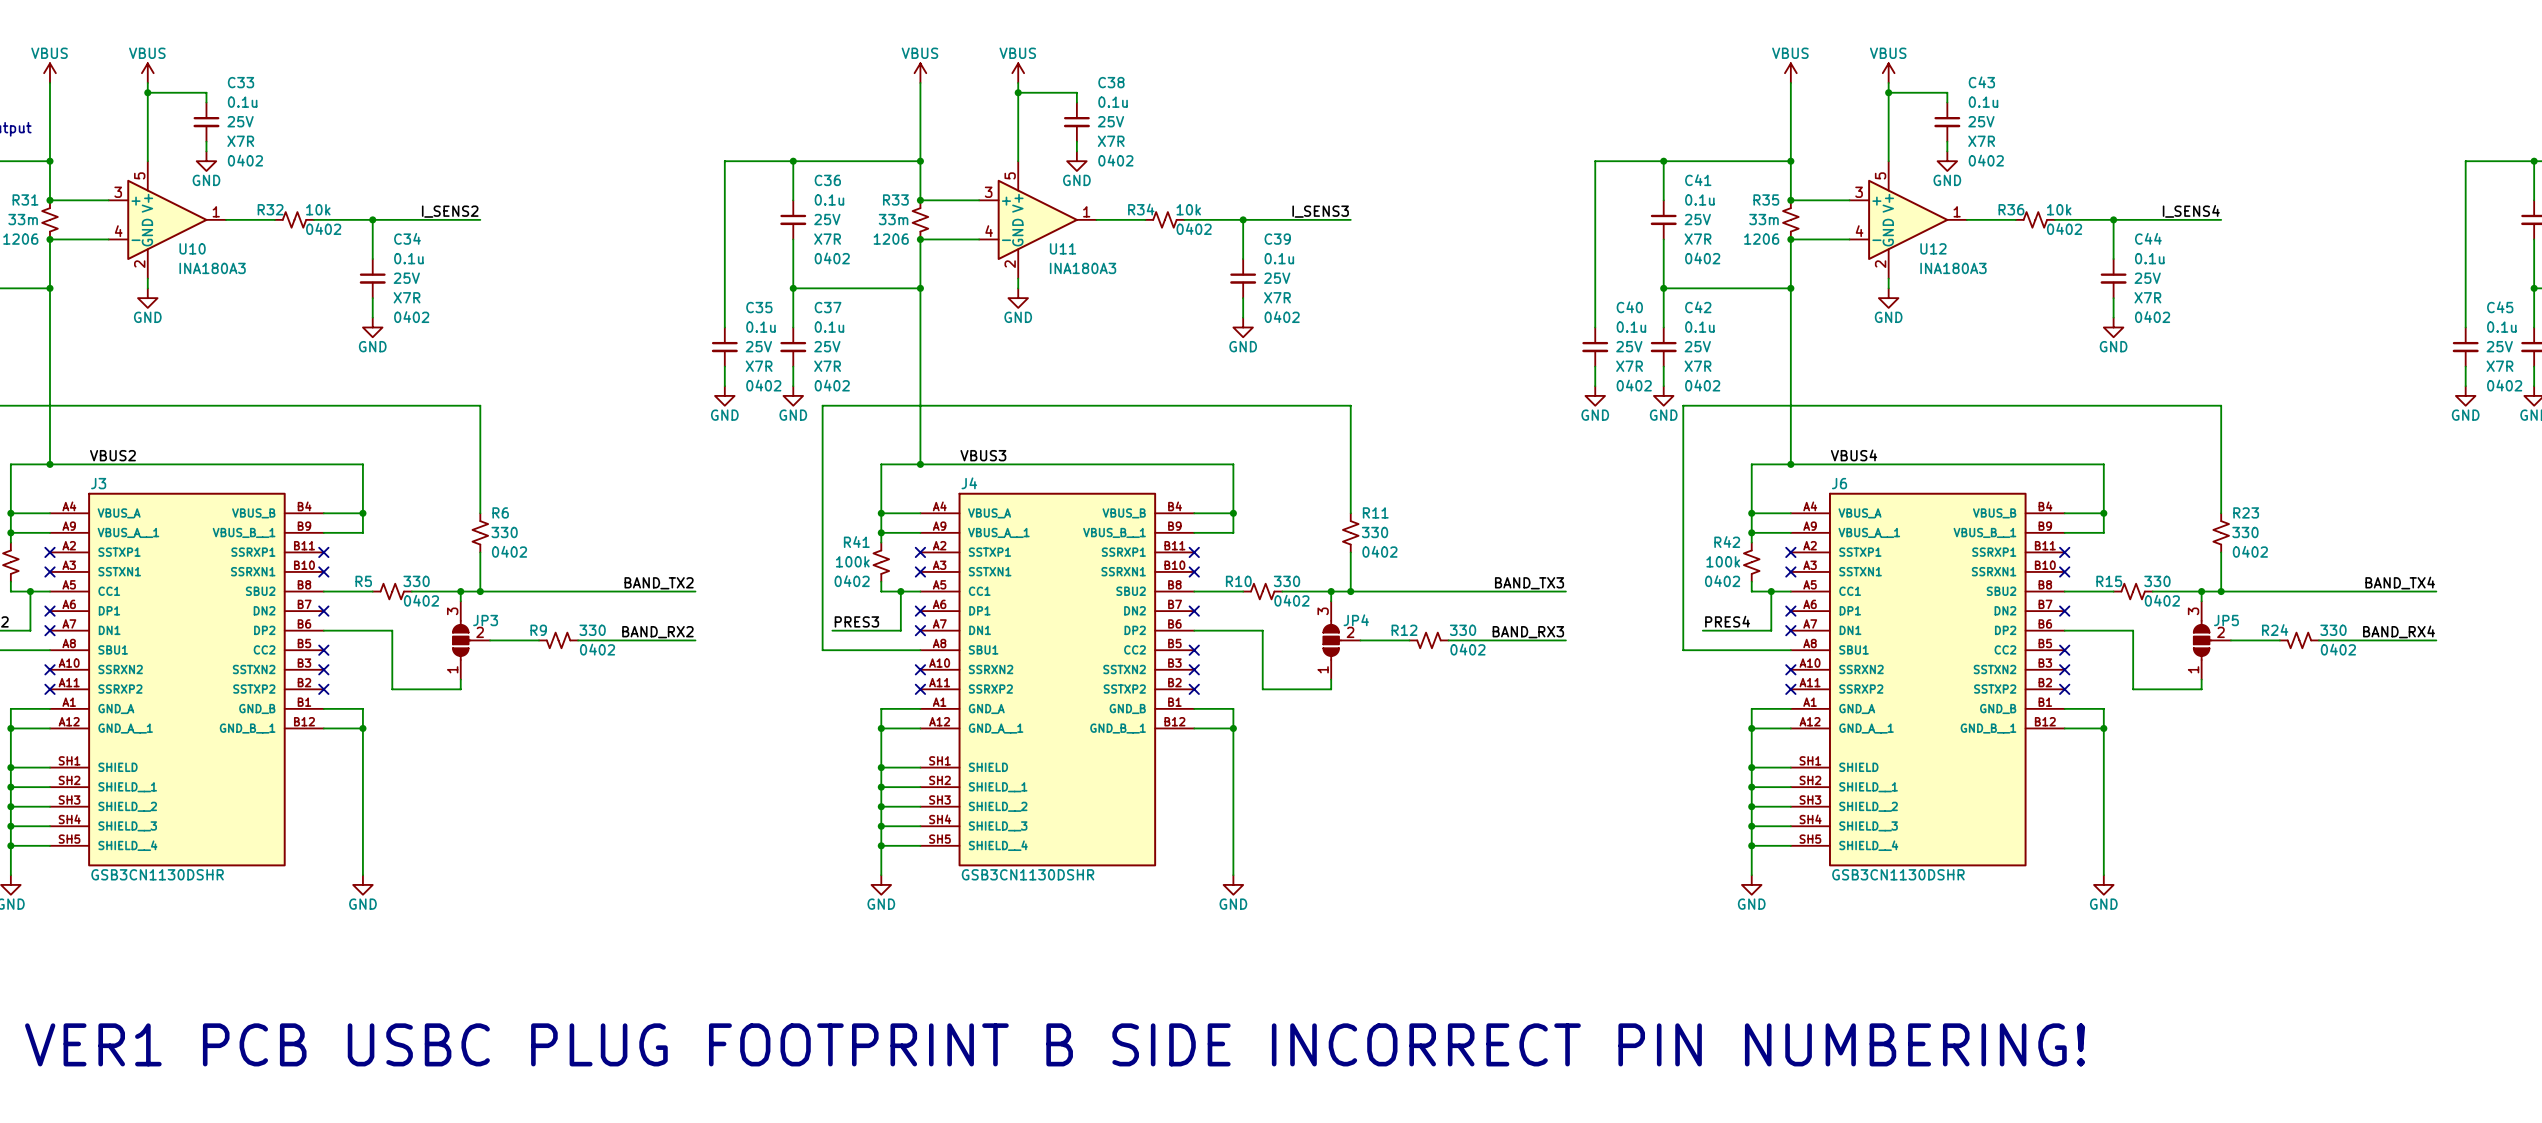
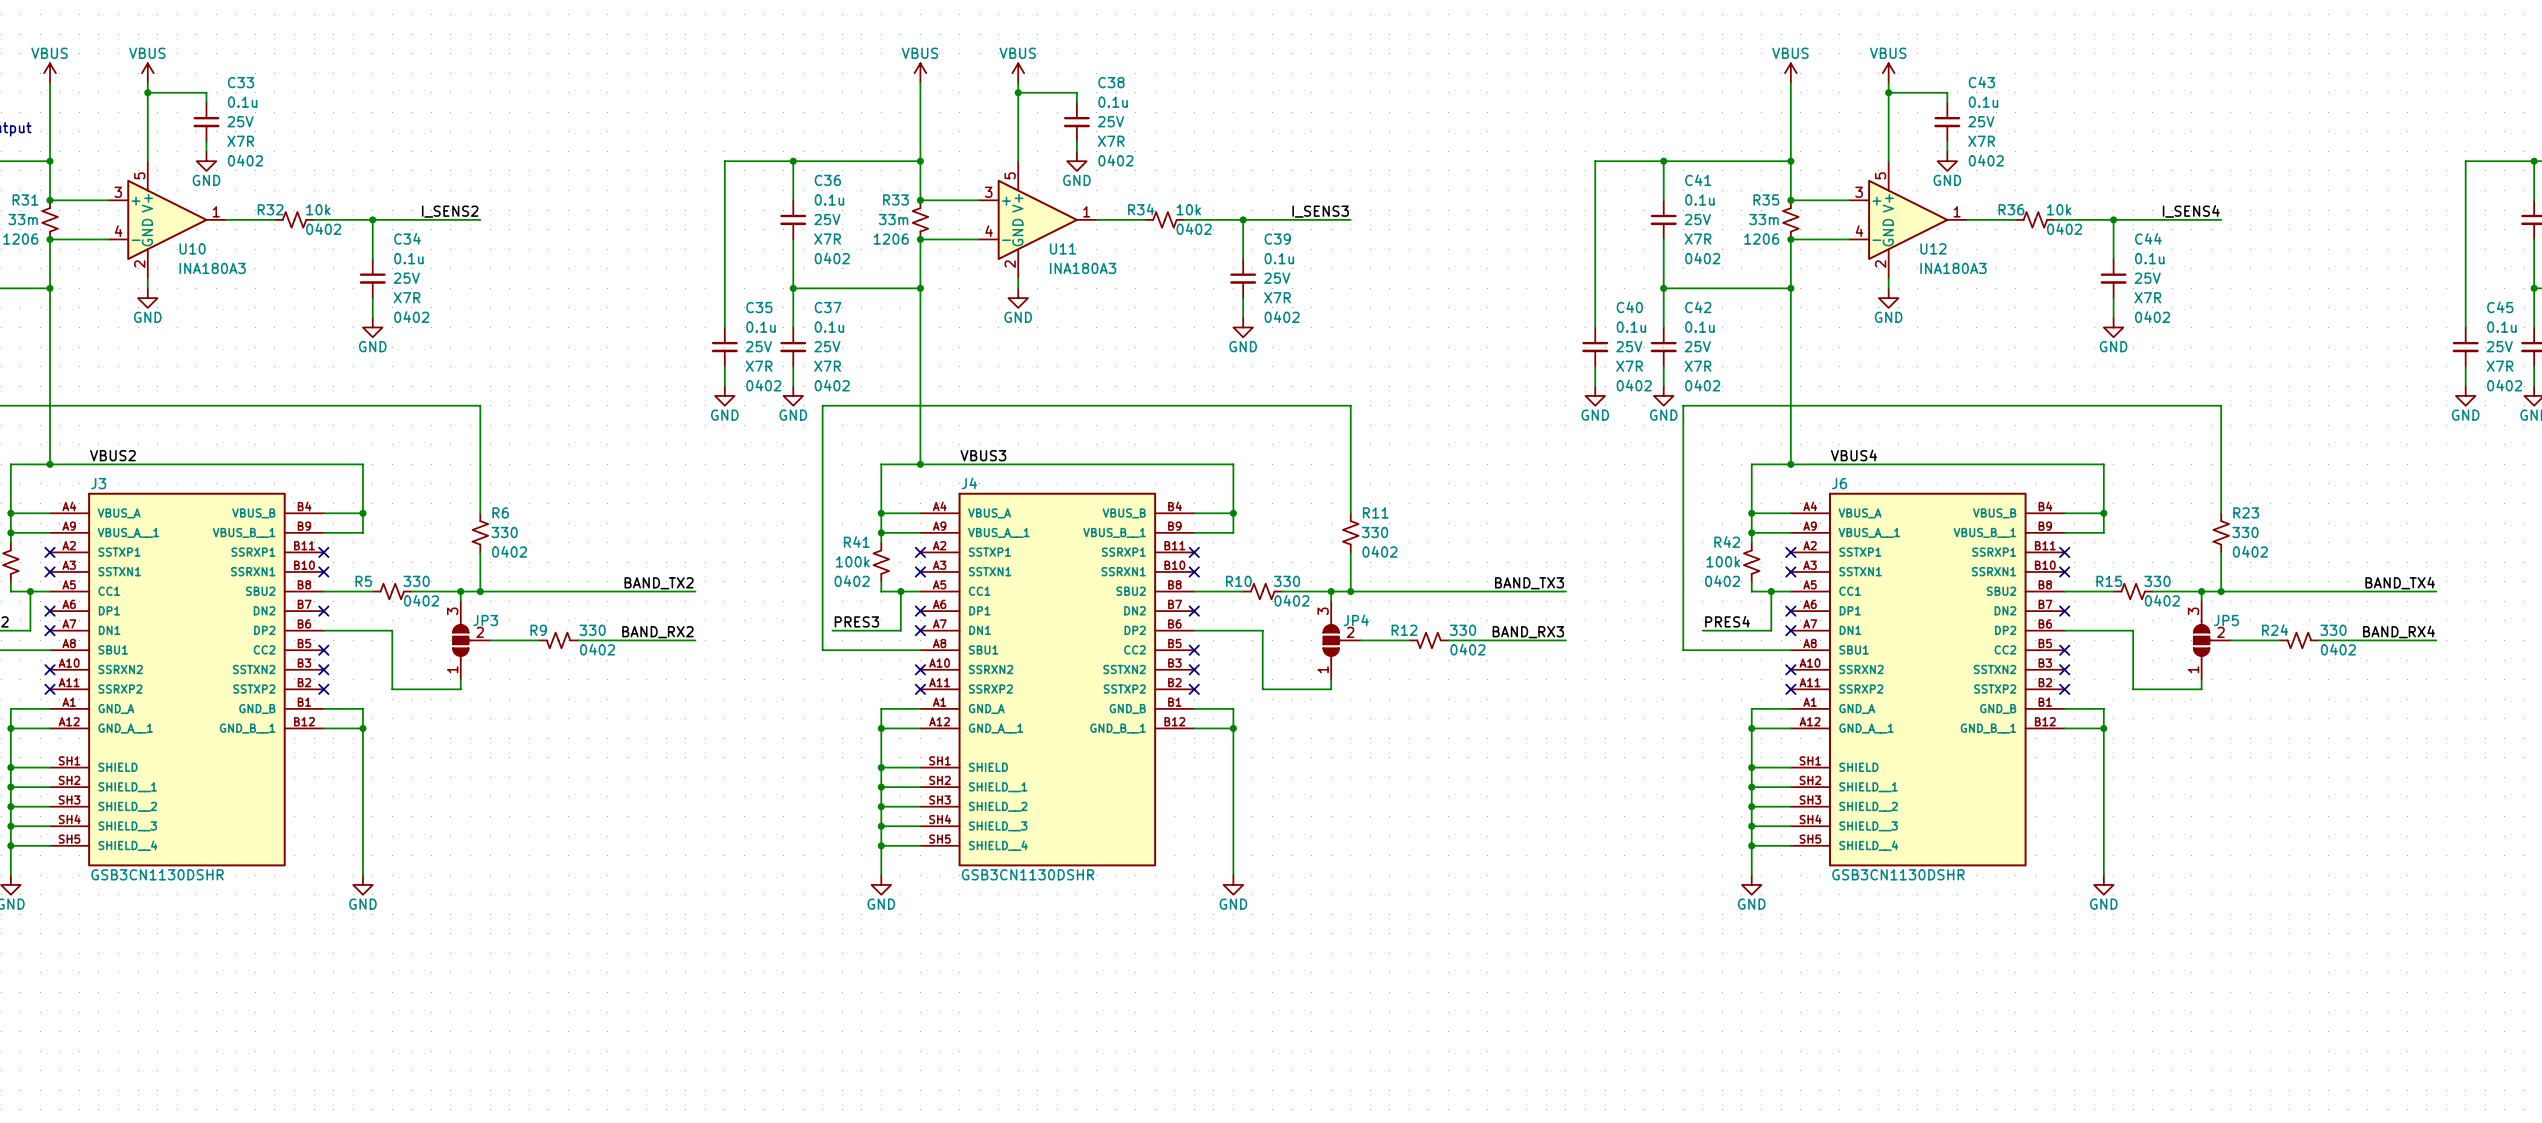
text: VER1 PCB USBC PLUG FOOTPRINT B SIDE INCORRECT PIN NUMBERING! (1055, 1044) -> none

